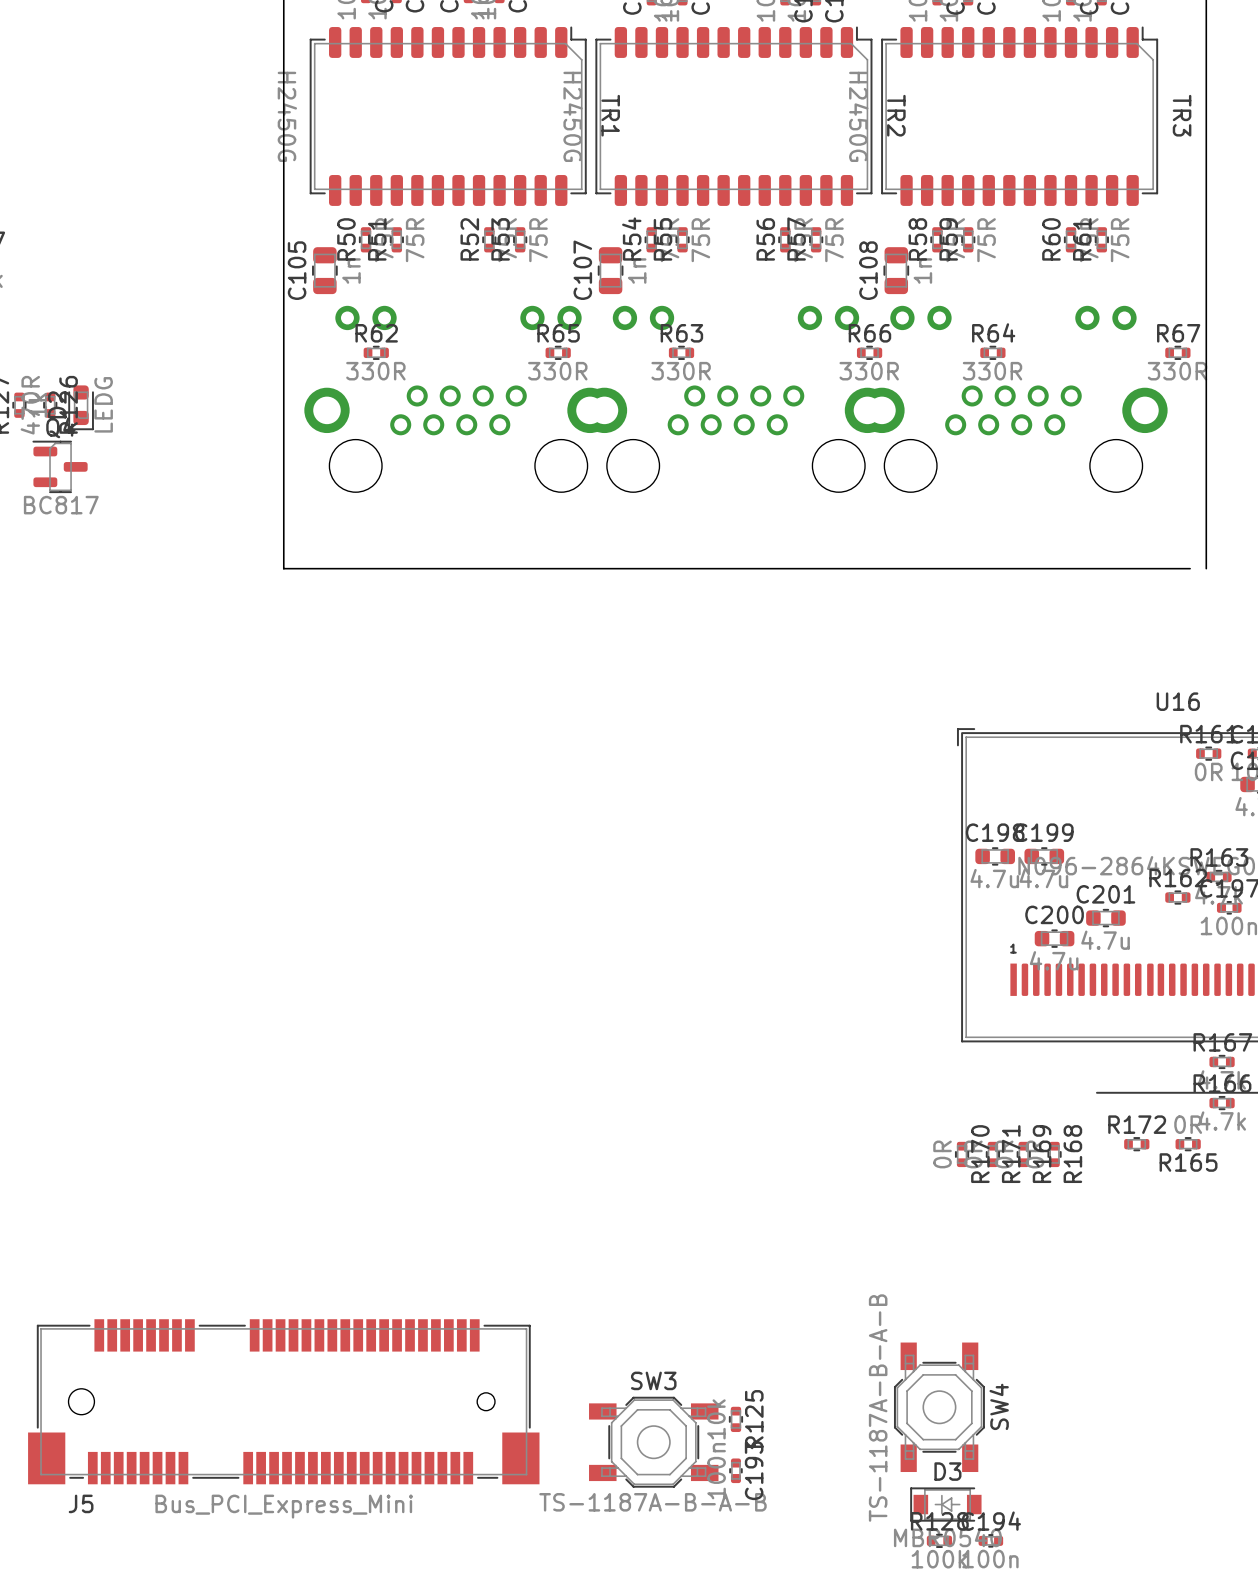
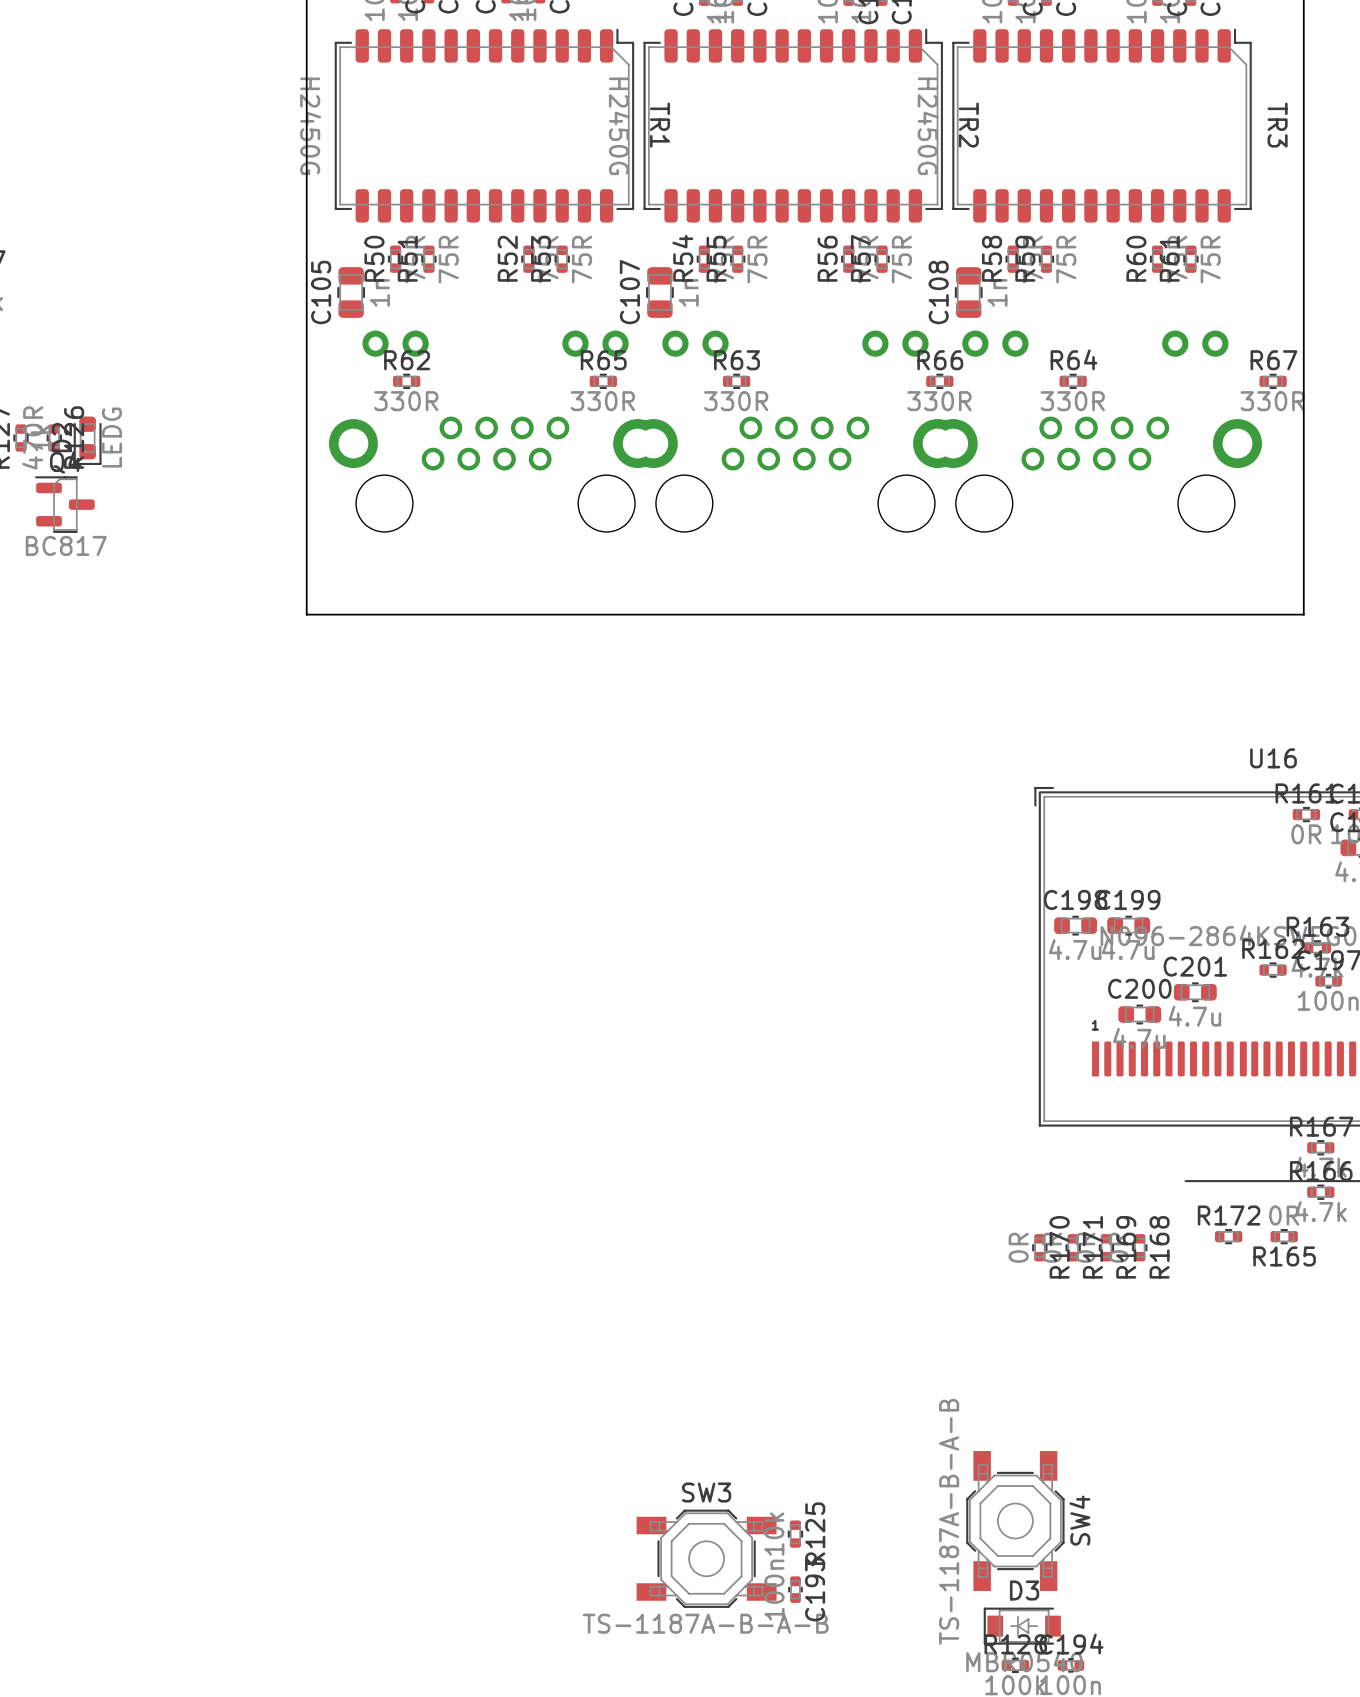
board edge: none -> (1286, 614) (1303, 614)
J5: Bus_PCI_Express_Mini (283, 1401) -> none

